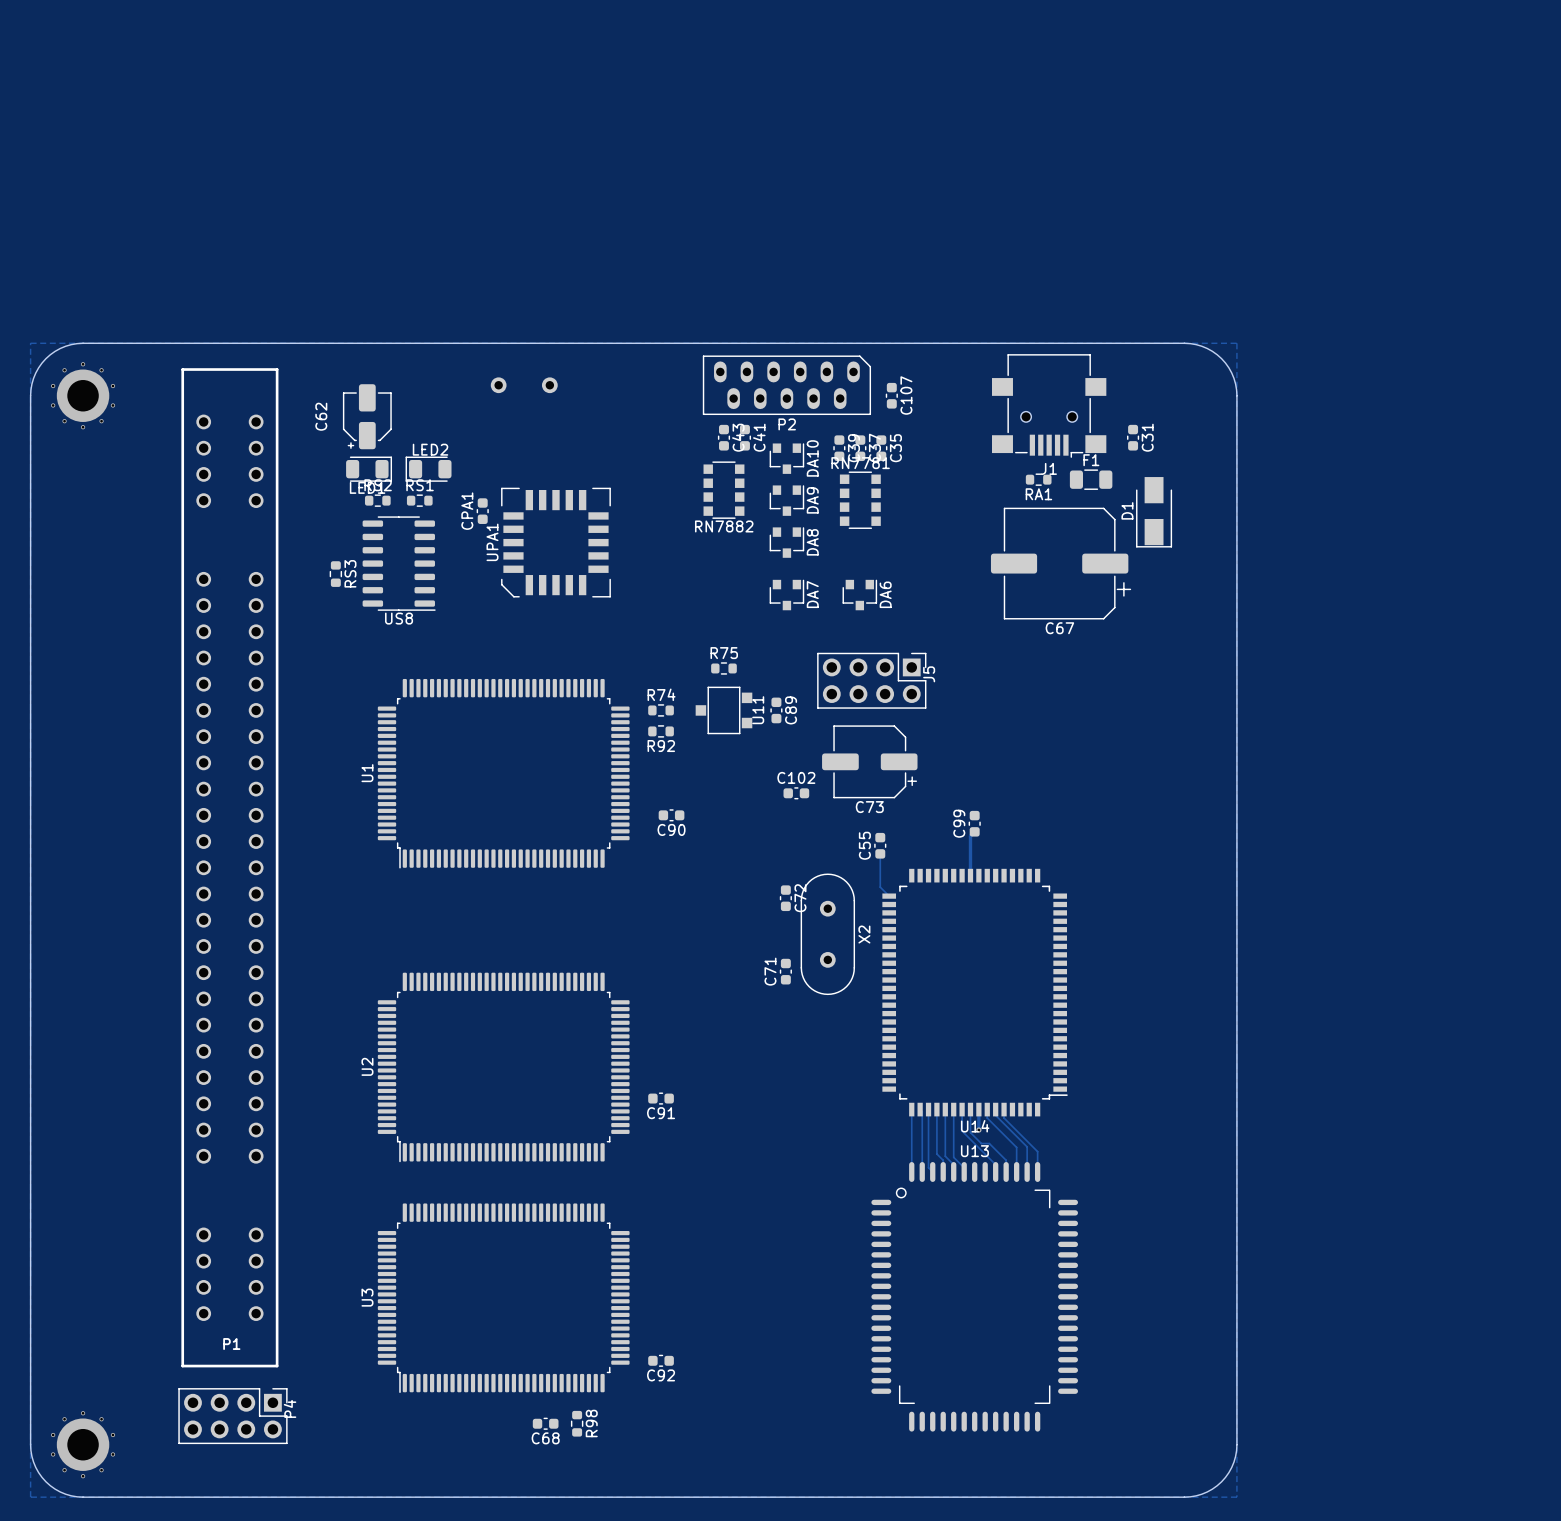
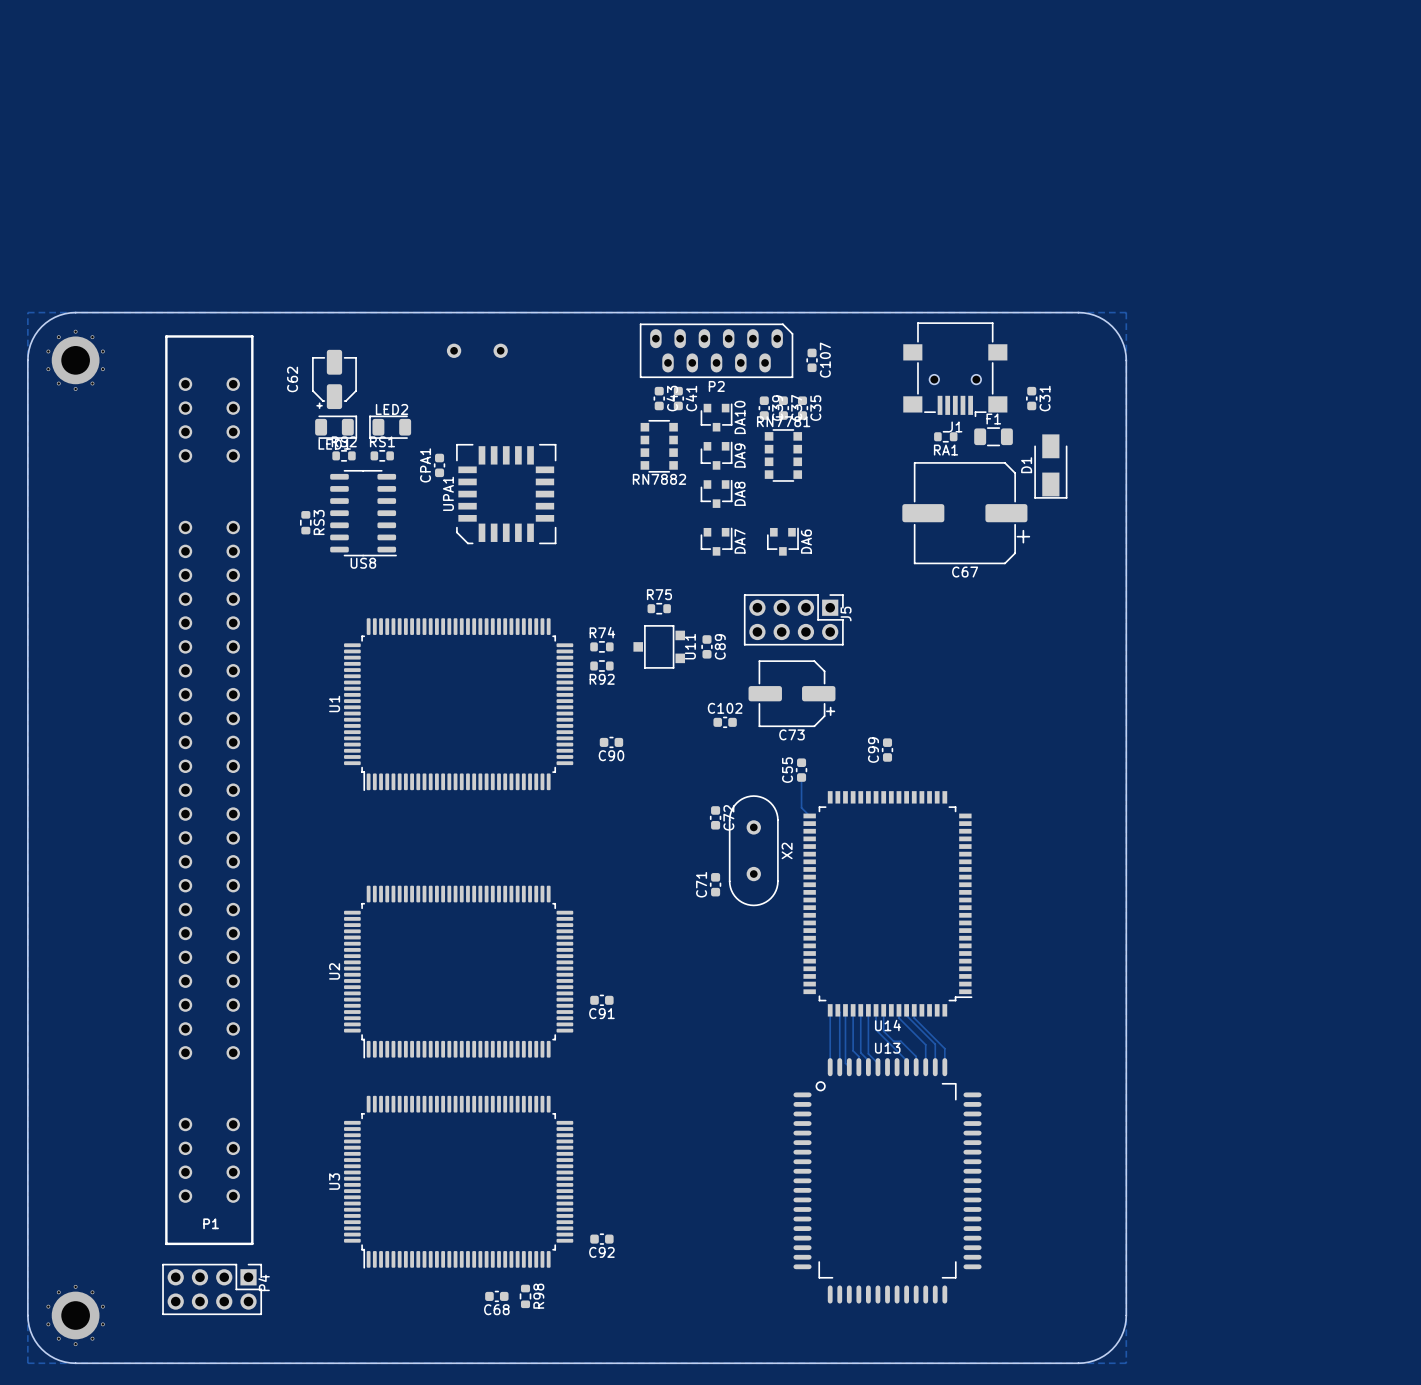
track: (974, 831) (970, 836) (970, 875) -> none
track: (978, 1109) (978, 1130) -> none
via: (978, 1130) -> none

